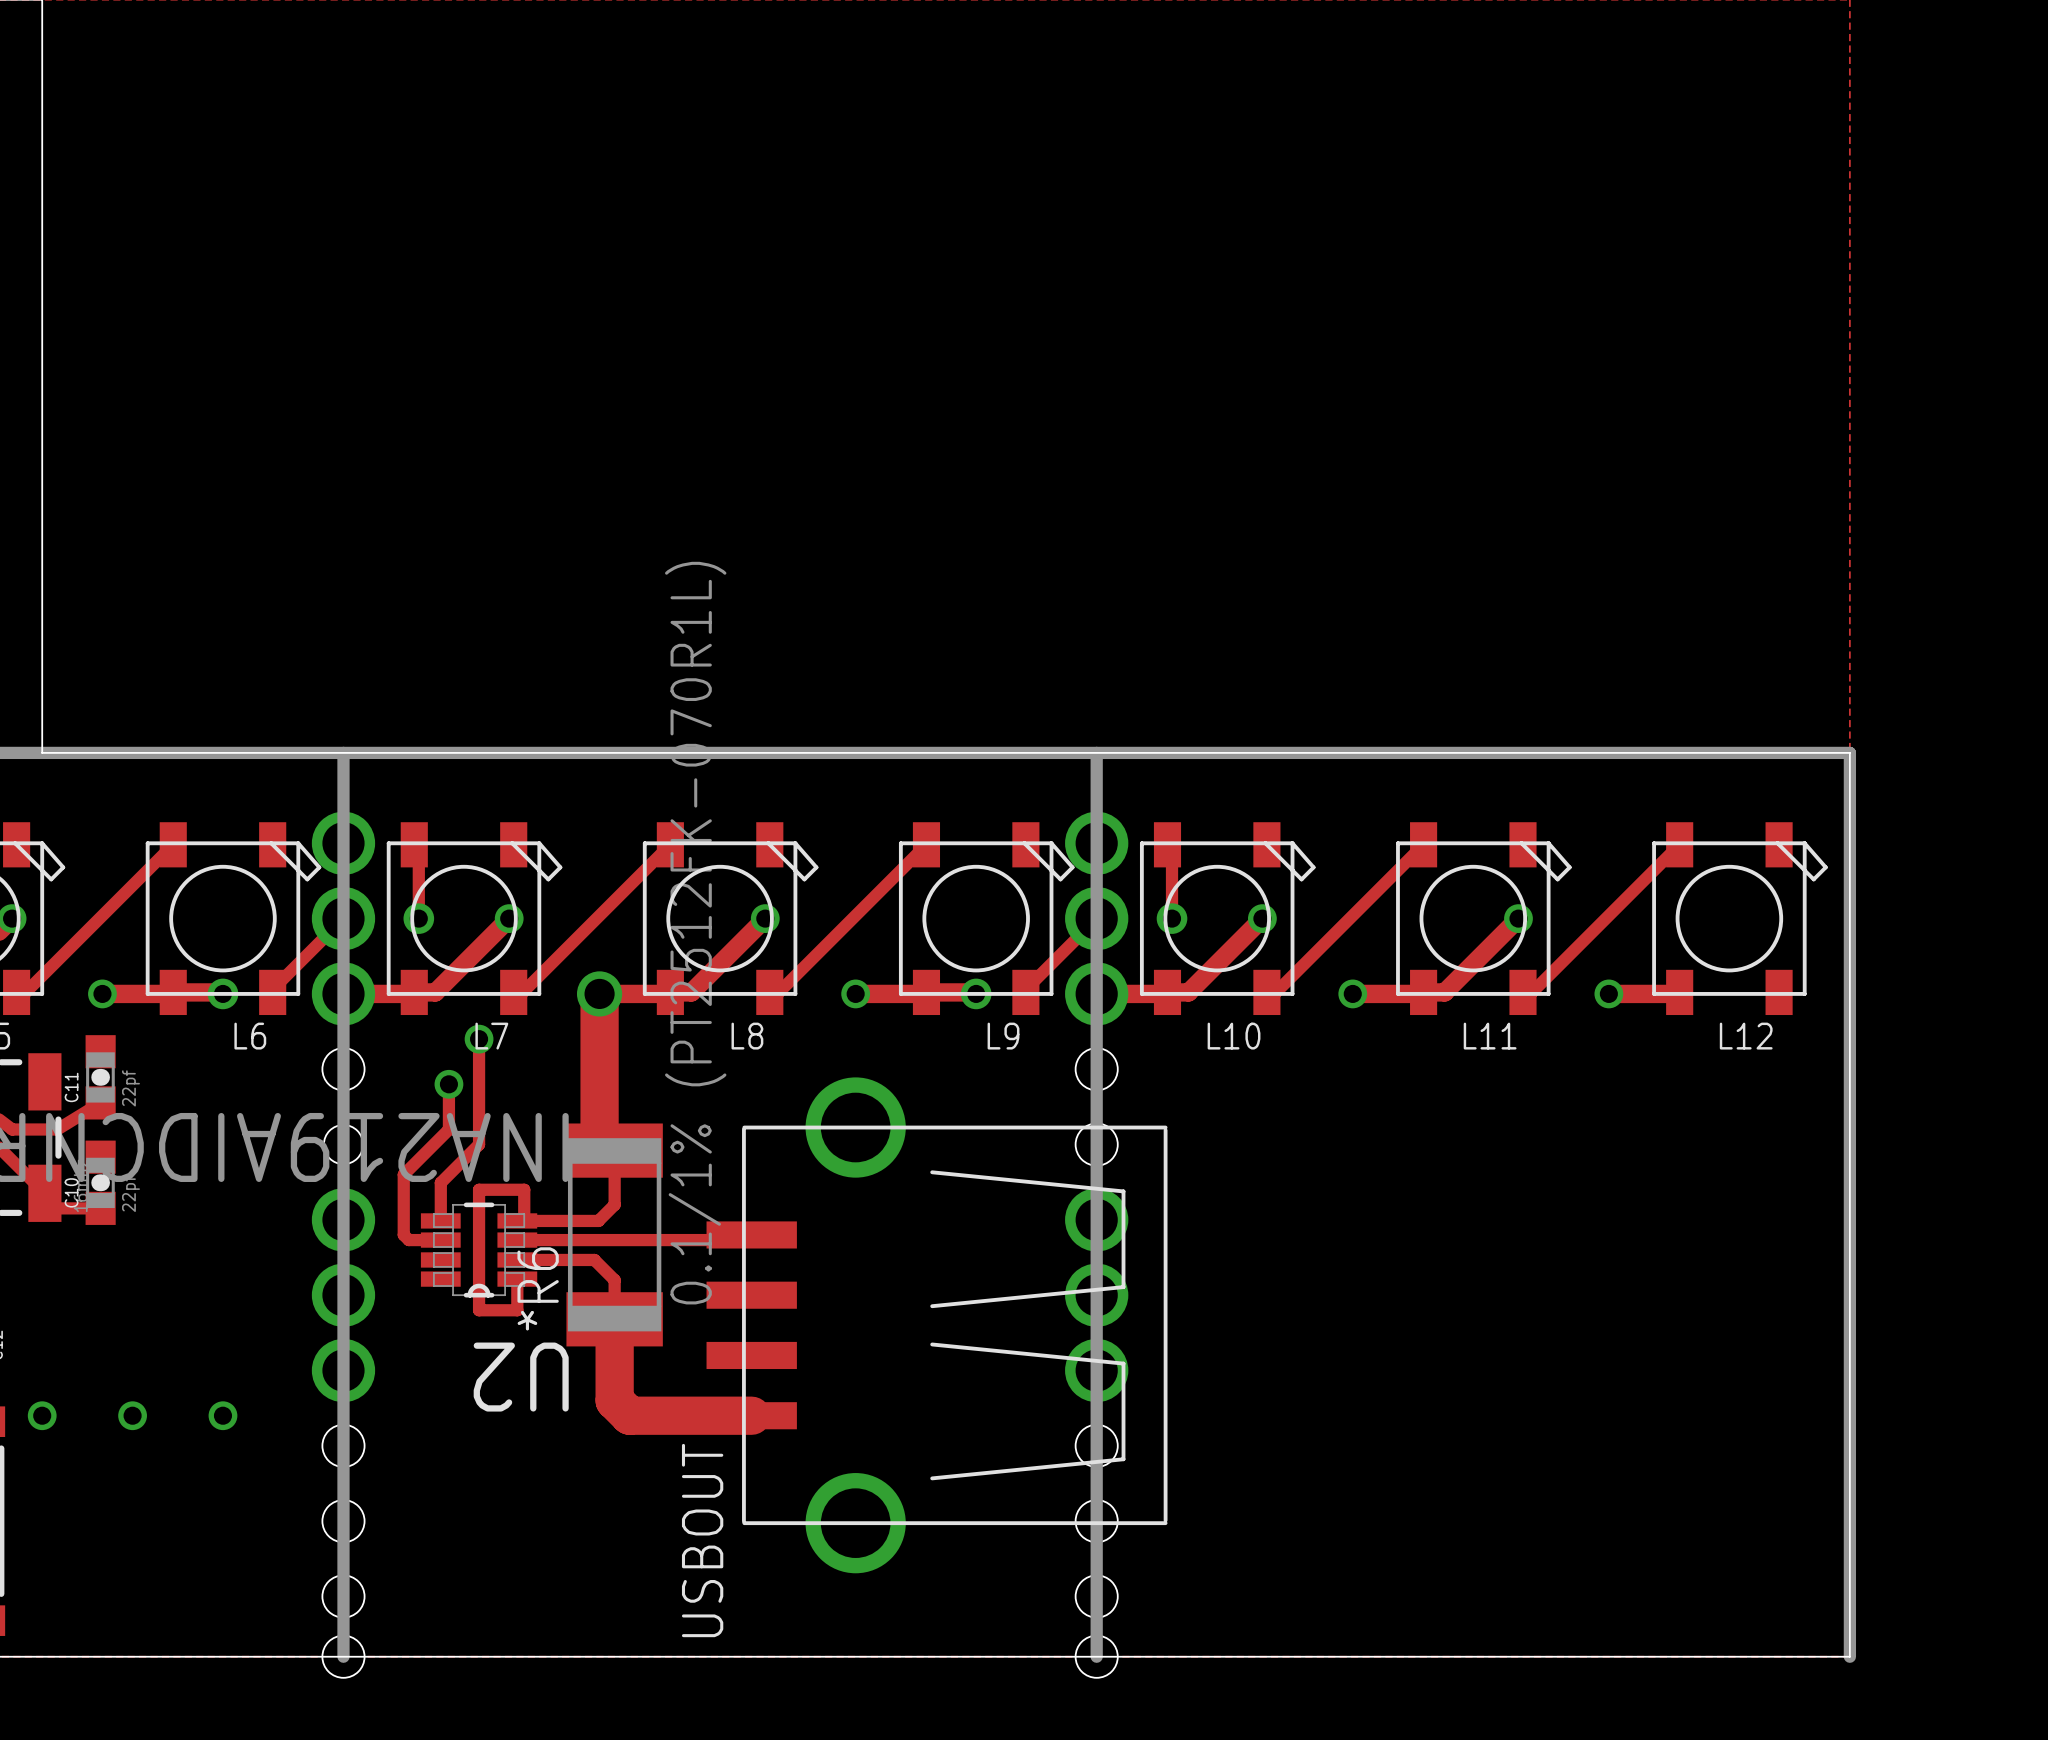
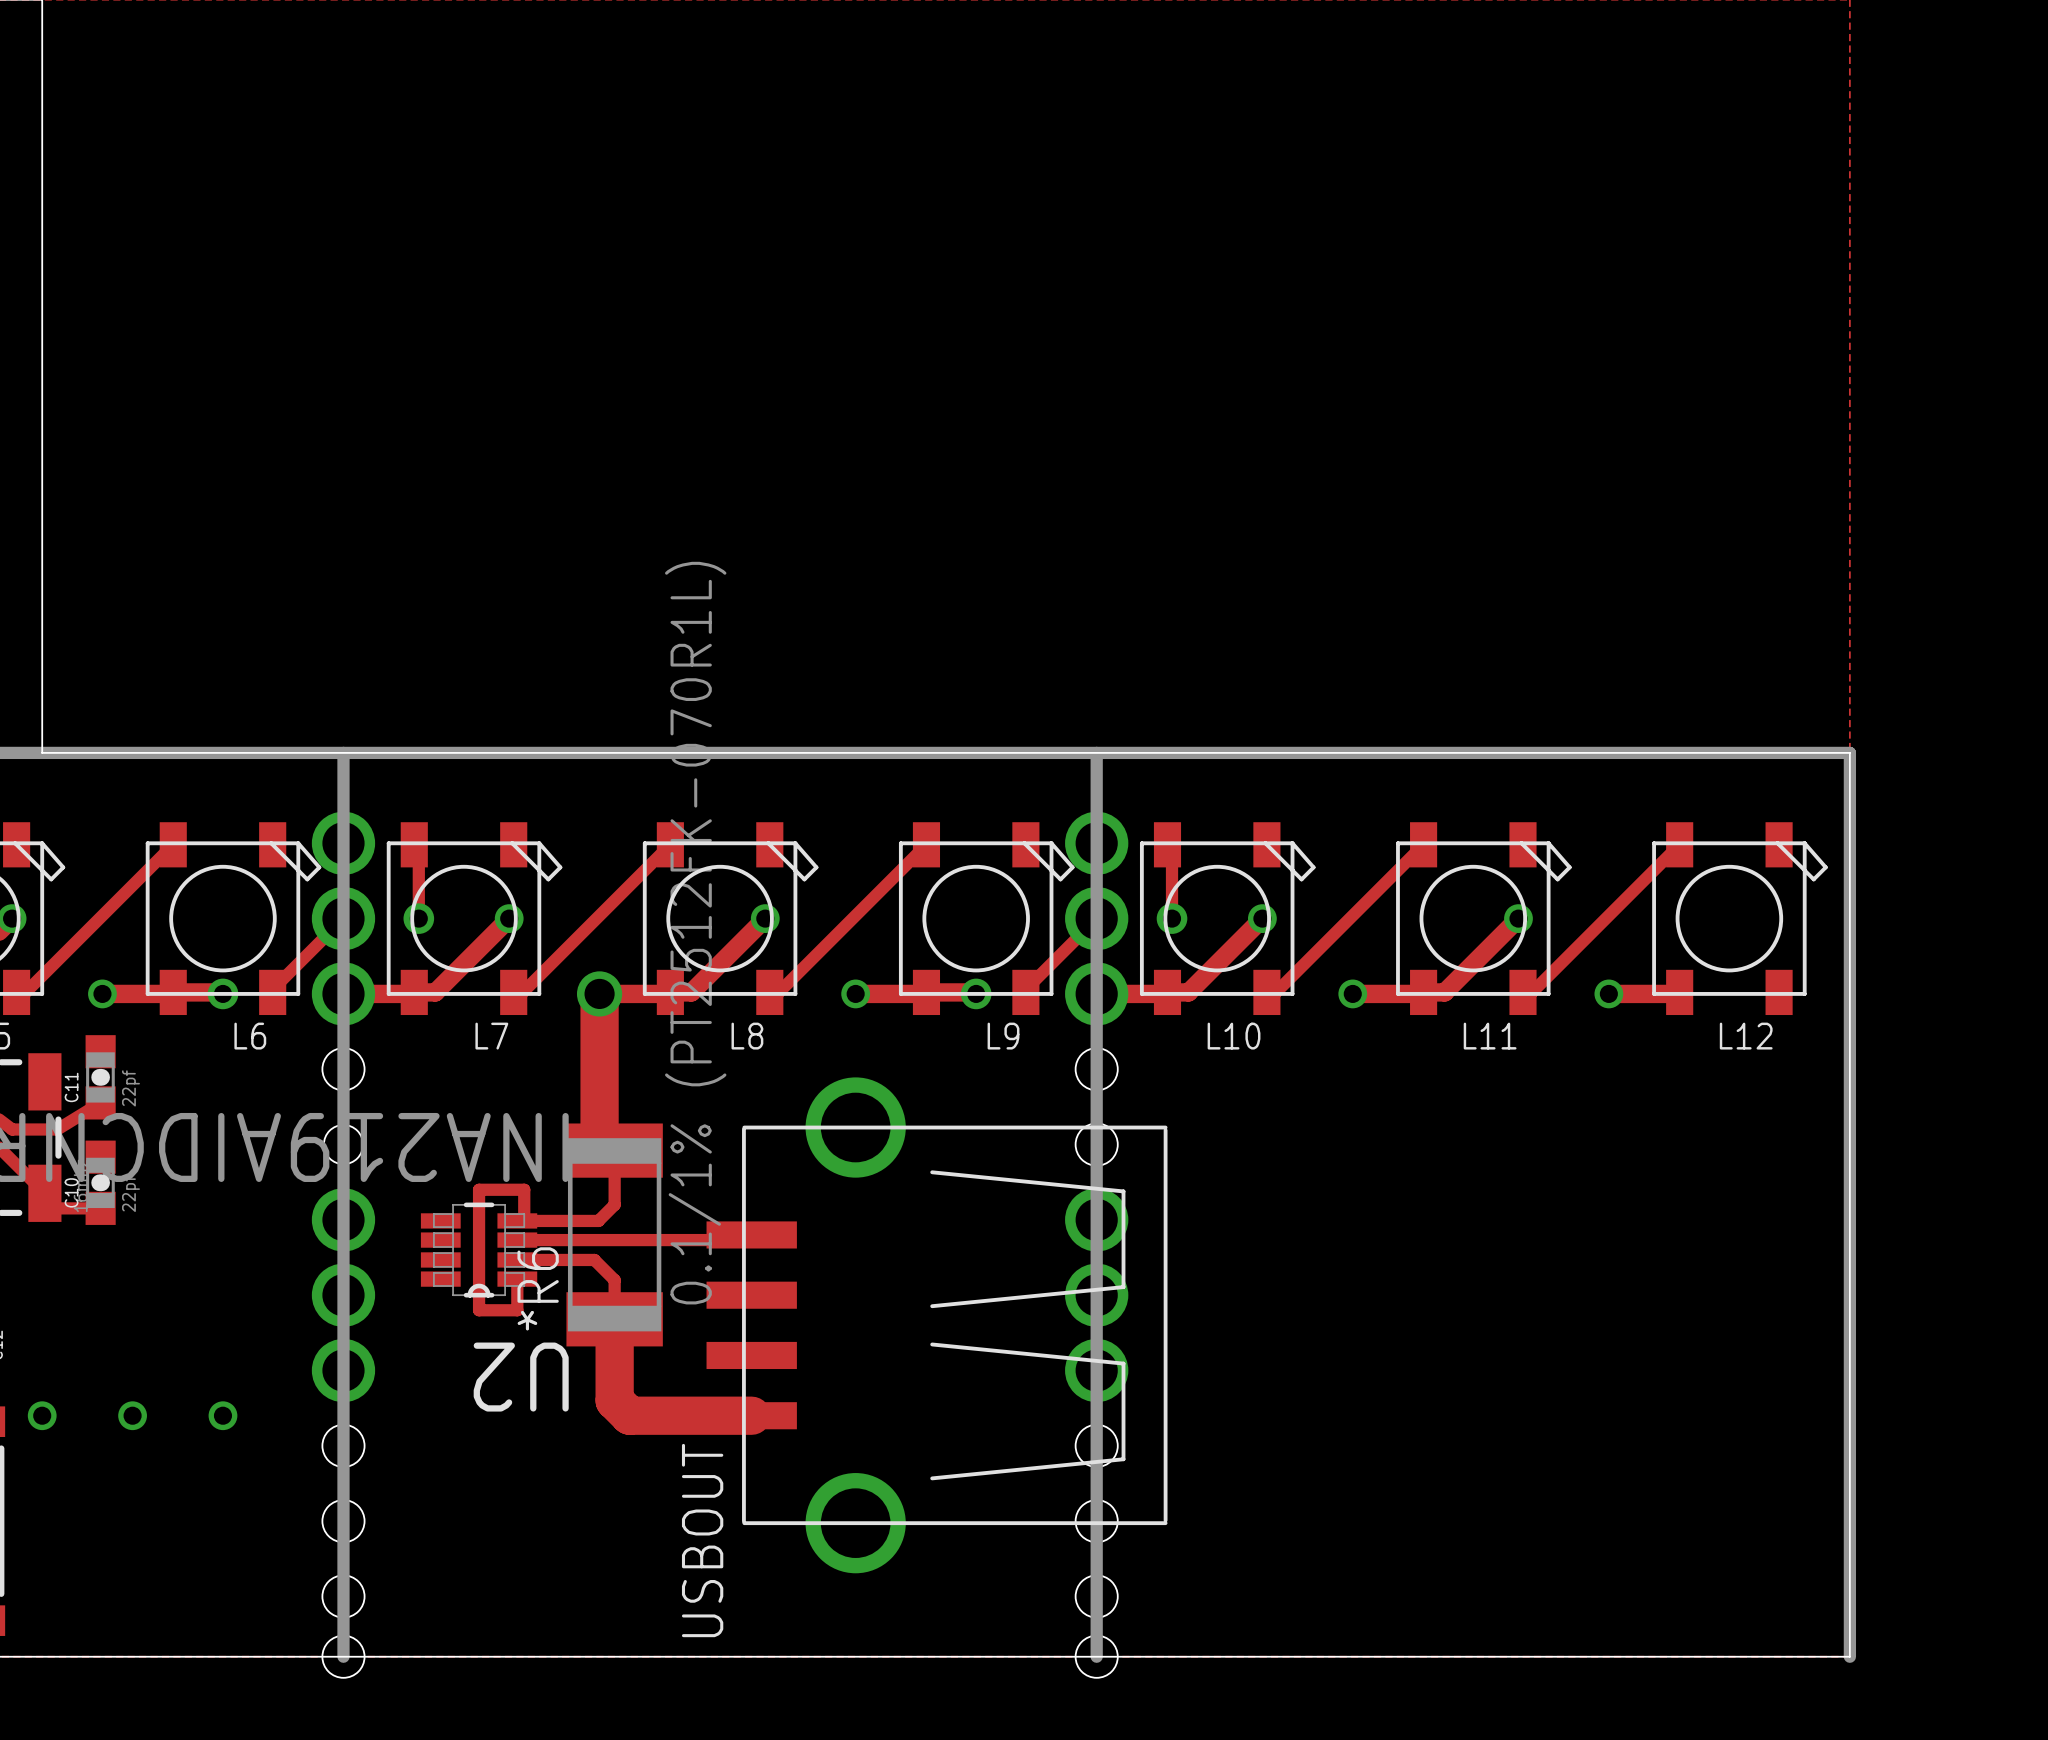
track: (479, 1039) (479, 1144) (440, 1182) (440, 1220) -> none
via: (479, 1039) -> none
track: (448, 1084) (448, 1129) (403, 1174) (403, 1234) (408, 1240) (440, 1240) -> none
via: (448, 1084) -> none

